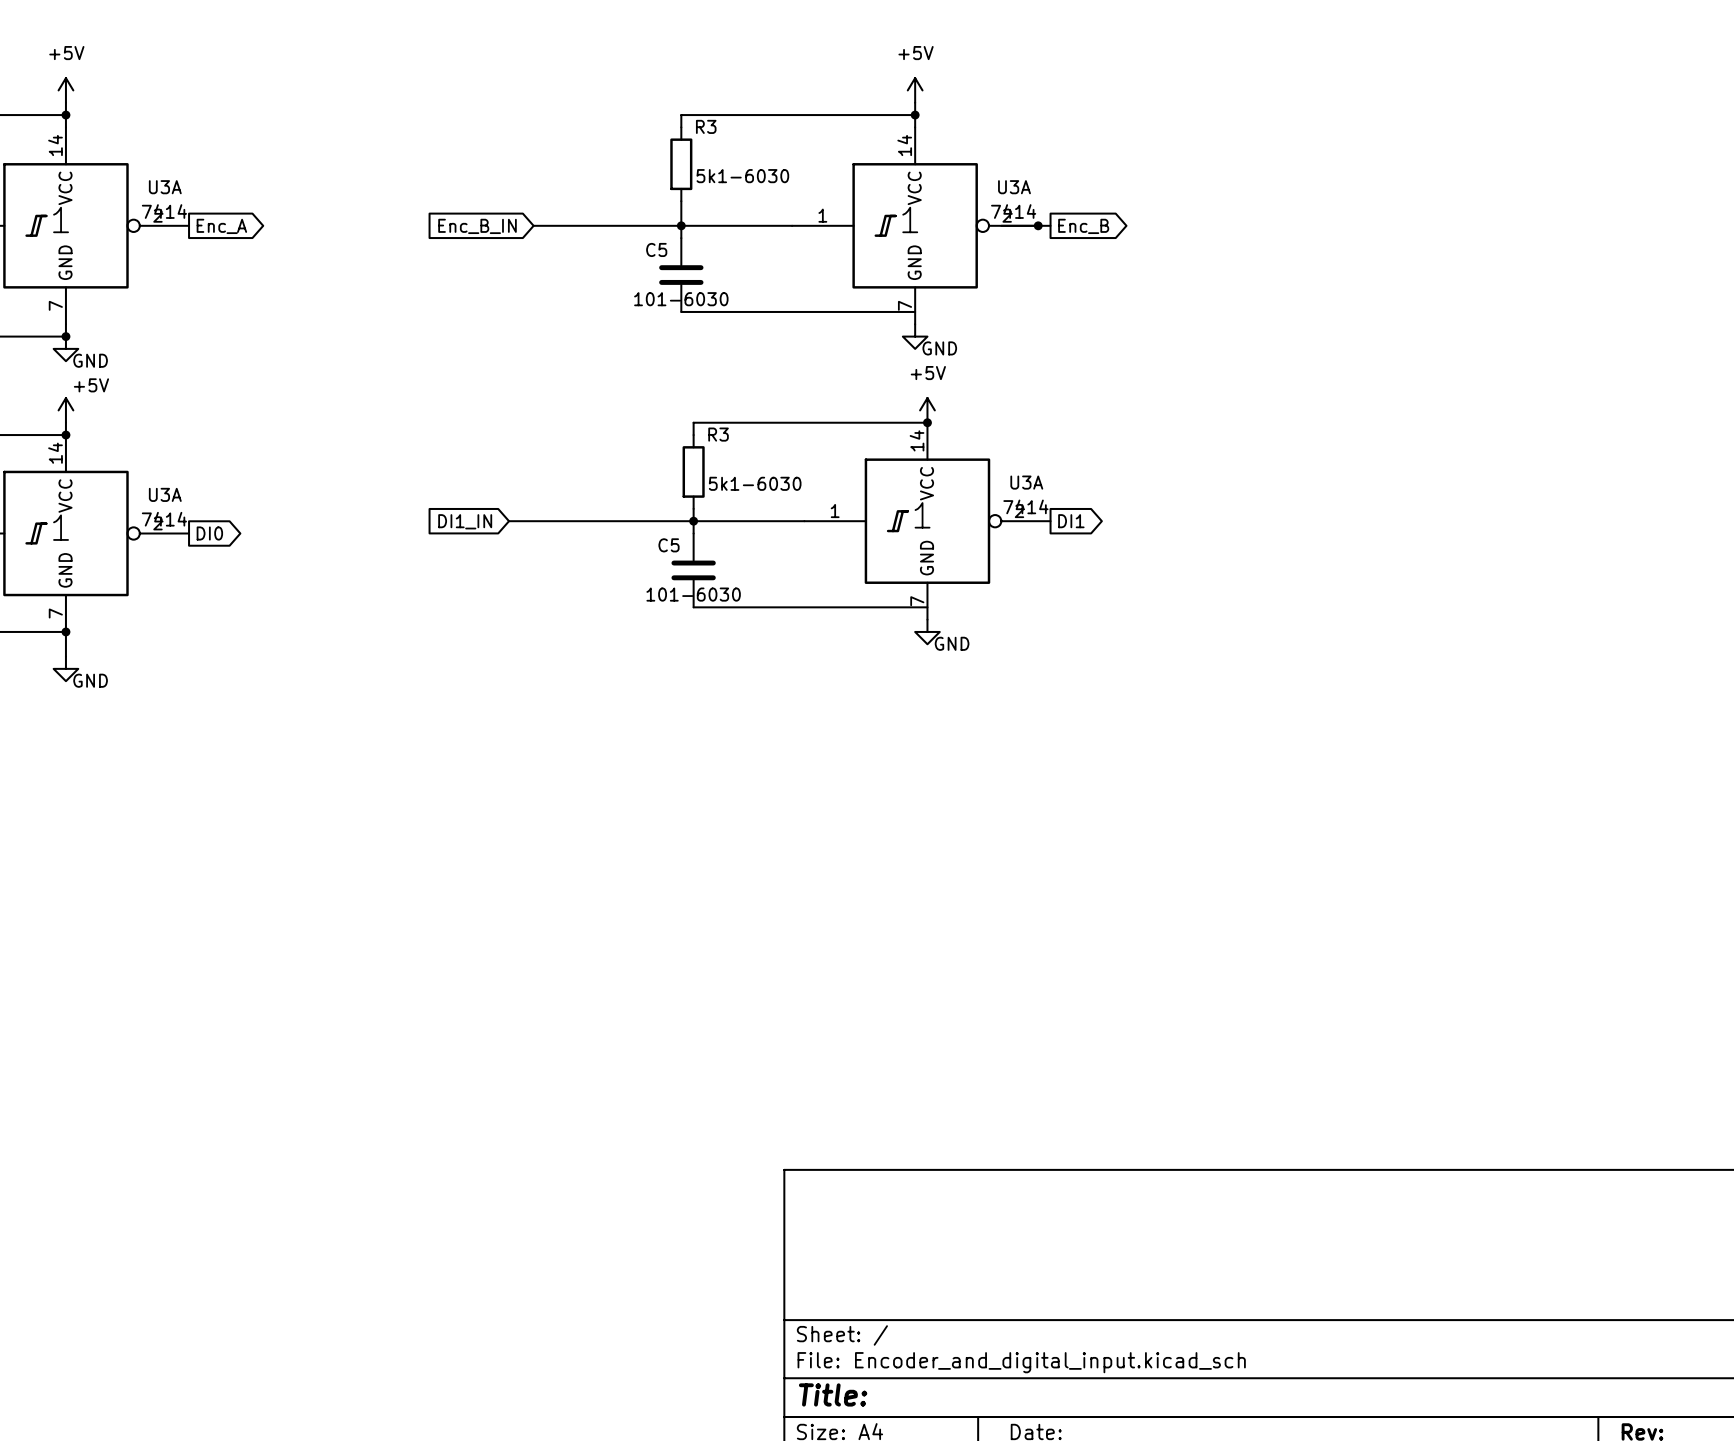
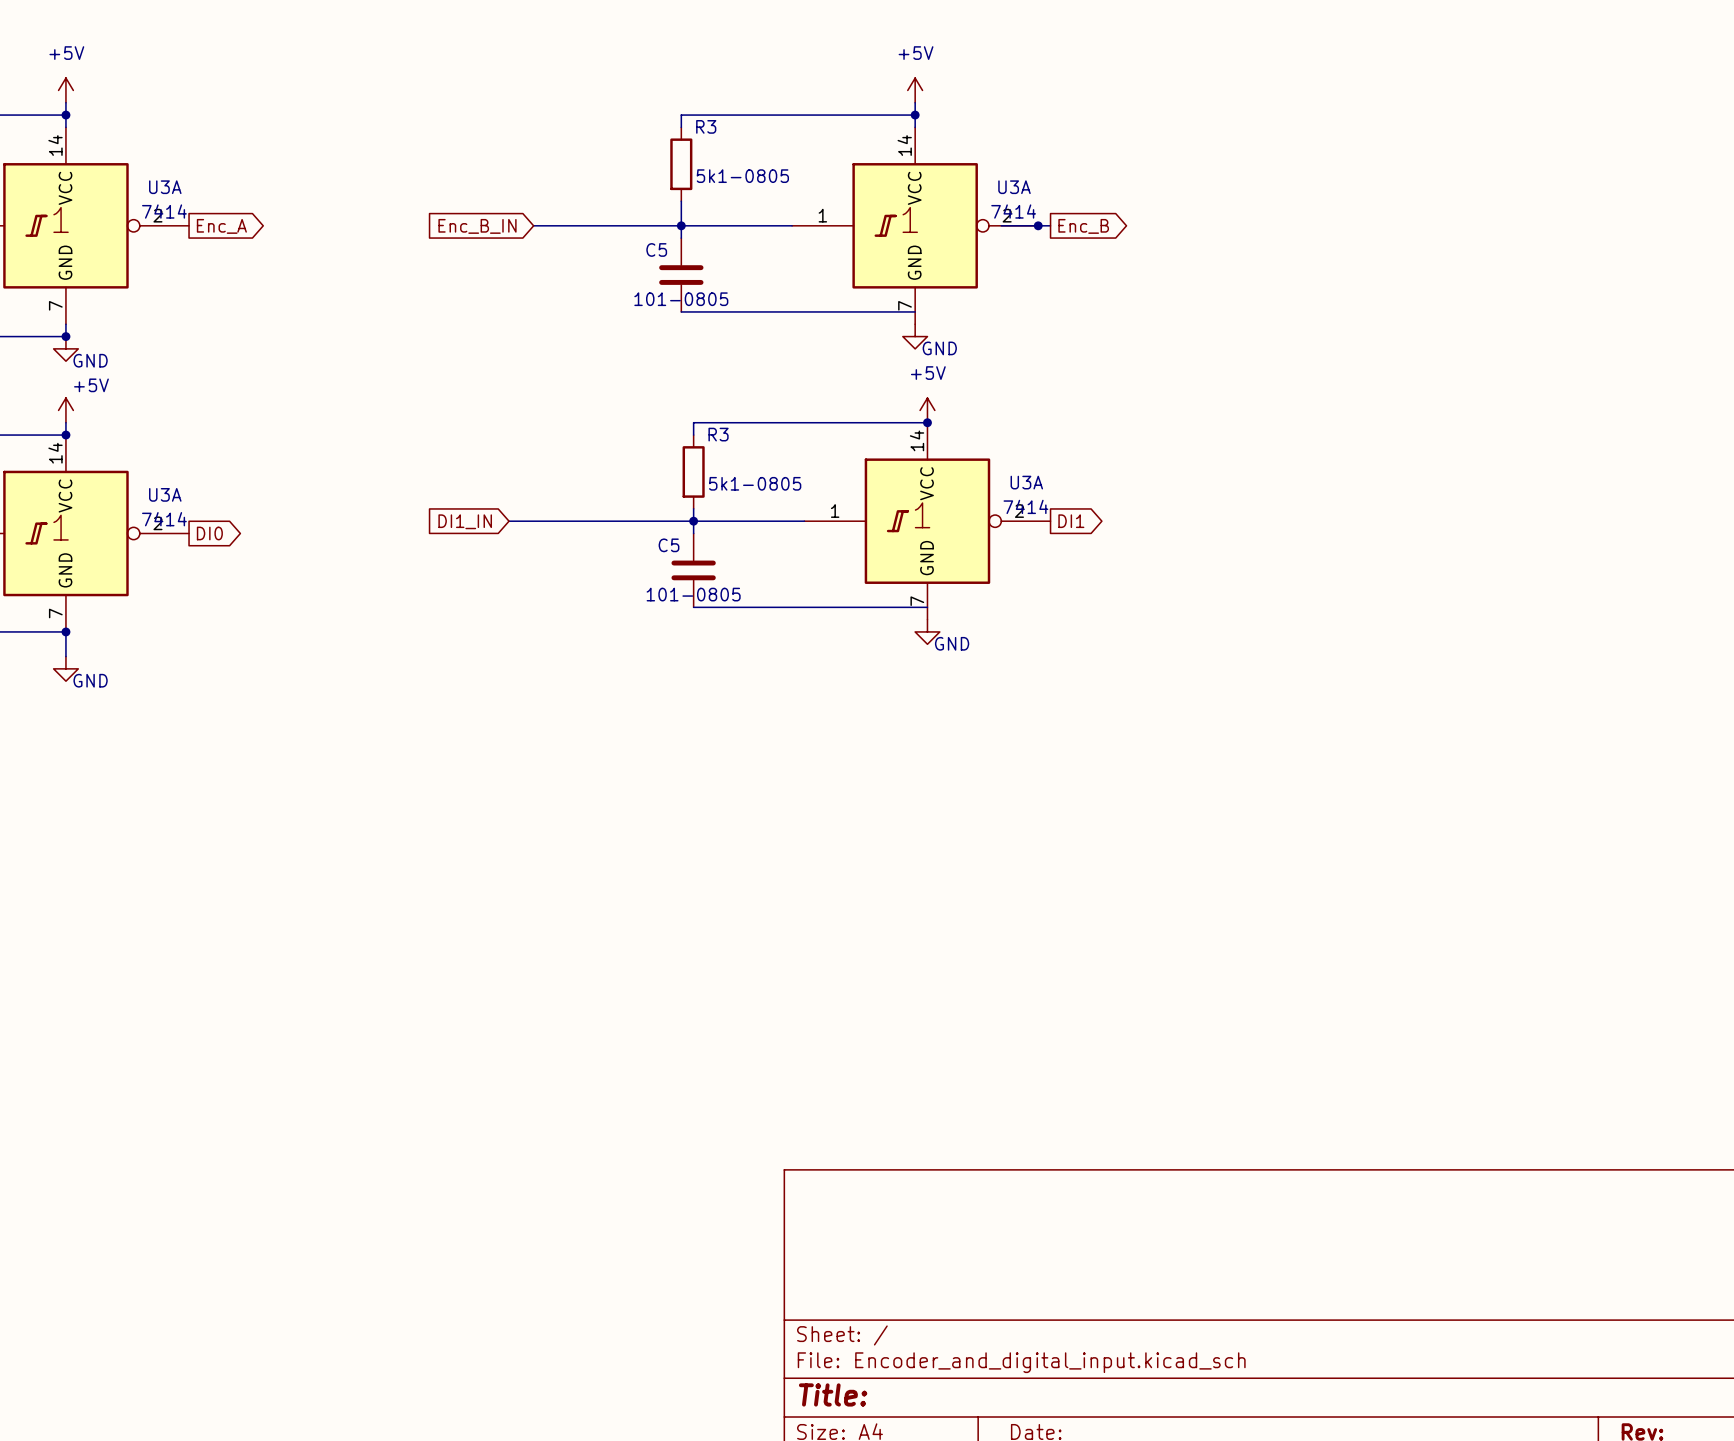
R3 value: 5k1-6030 (742, 176) -> 5k1-0805 (742, 176)
C5 value: 101-6030 (681, 299) -> 101-0805 (681, 299)
R3 value: 5k1-6030 (755, 483) -> 5k1-0805 (755, 483)
C5 value: 101-6030 (693, 594) -> 101-0805 (693, 594)

